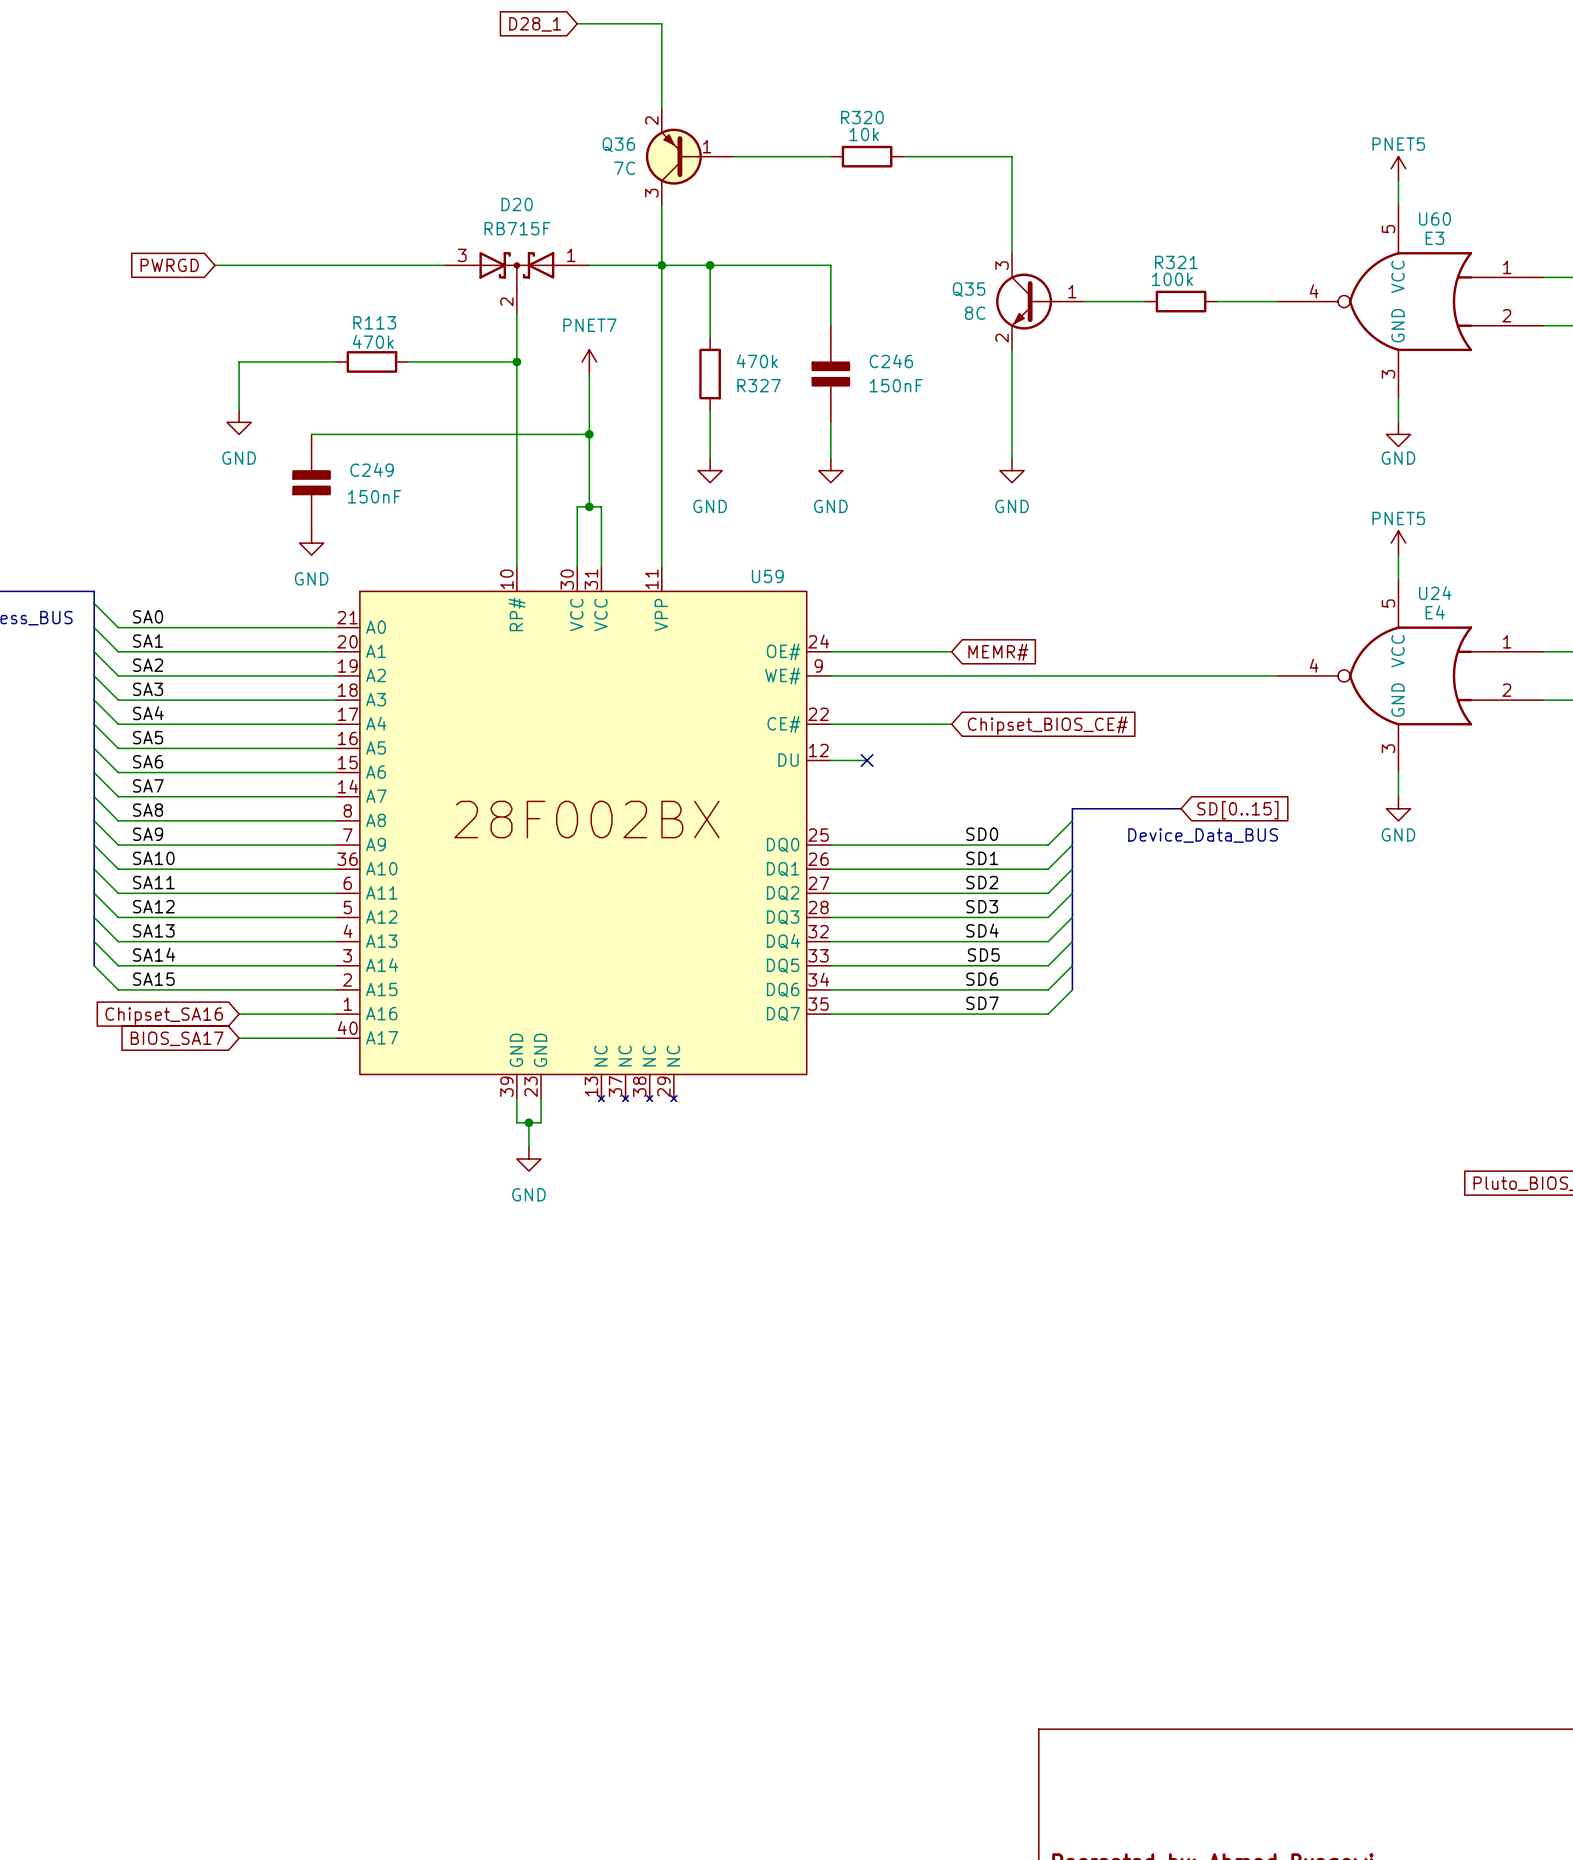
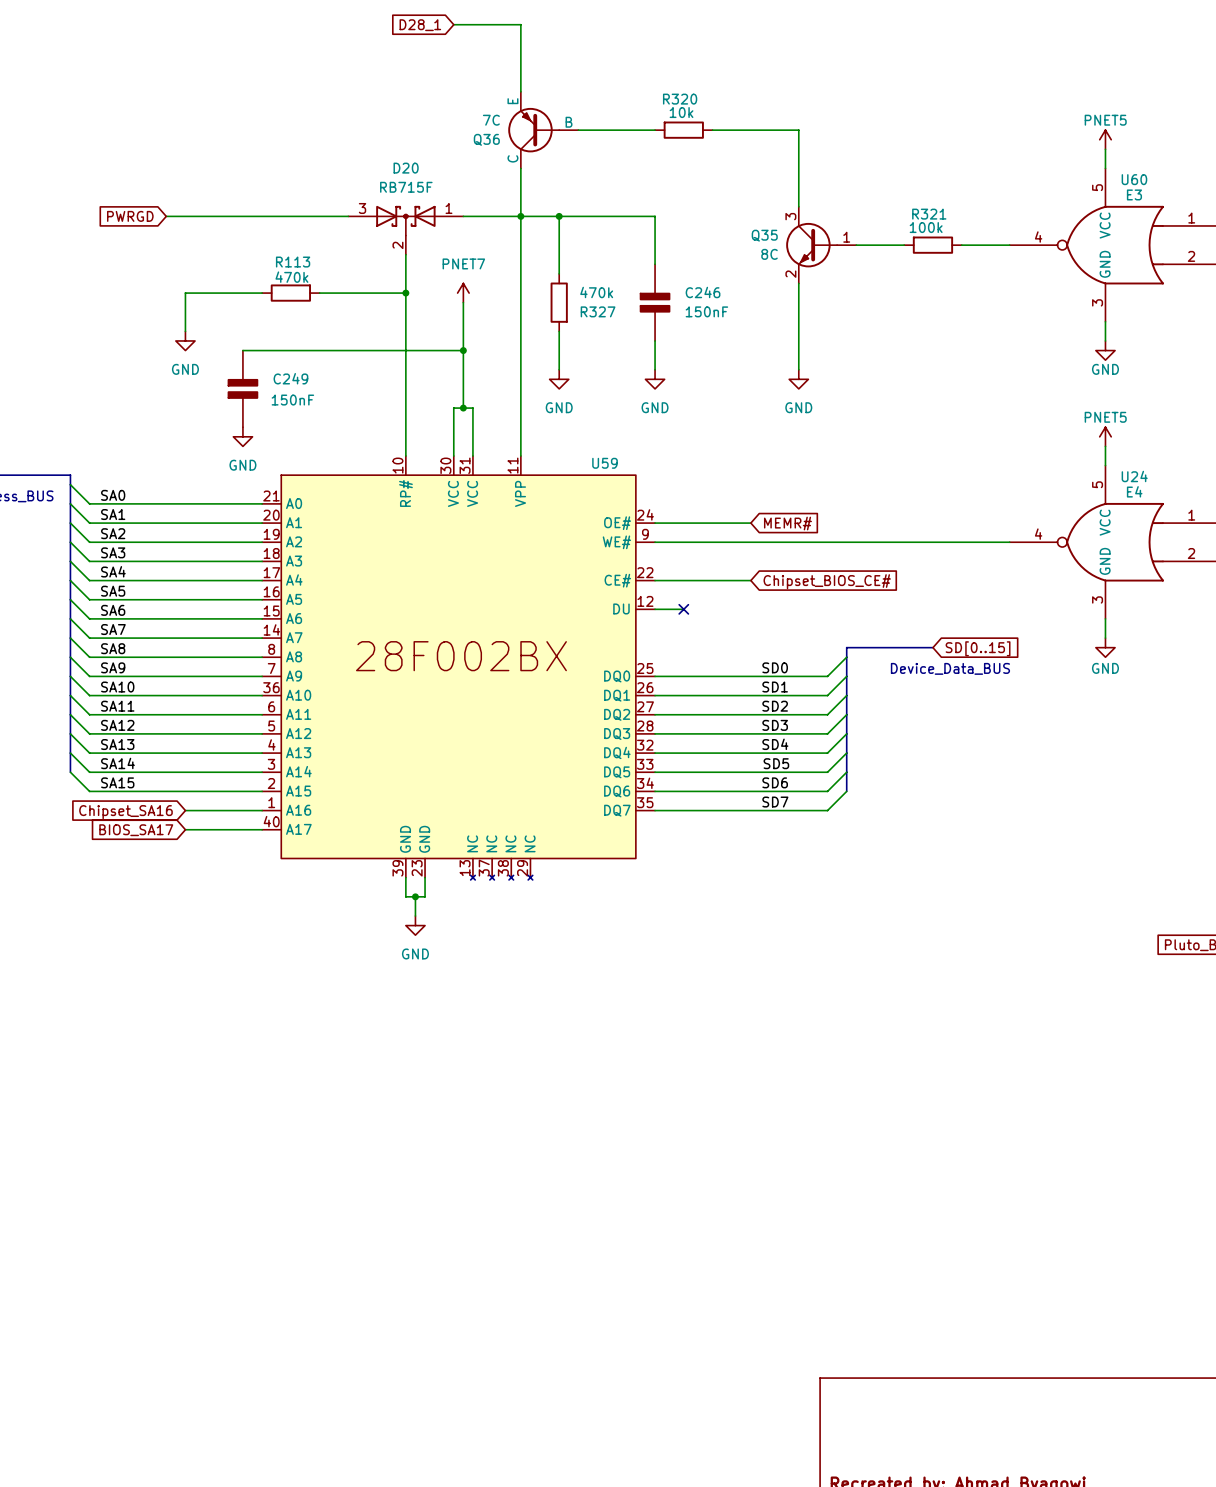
Q36 symbol: [645, 108, 735, 205] -> [508, 91, 579, 169]
Q36 name position: Q36 (618, 144) -> Q36 (486, 139)
Q36 value position: 7C (624, 168) -> 7C (491, 120)

